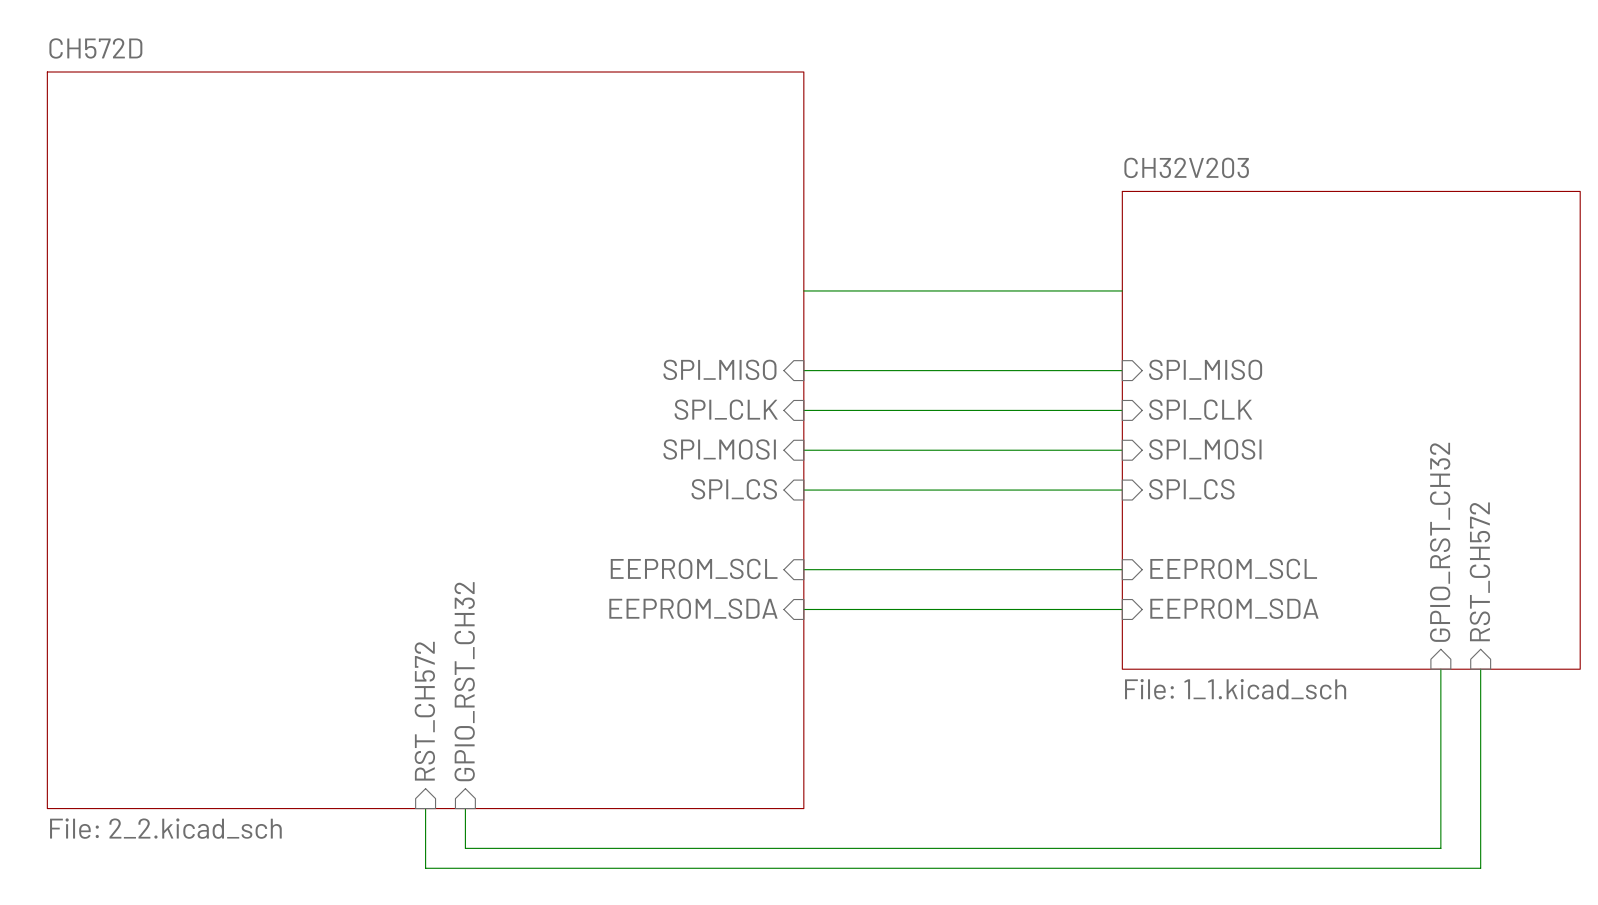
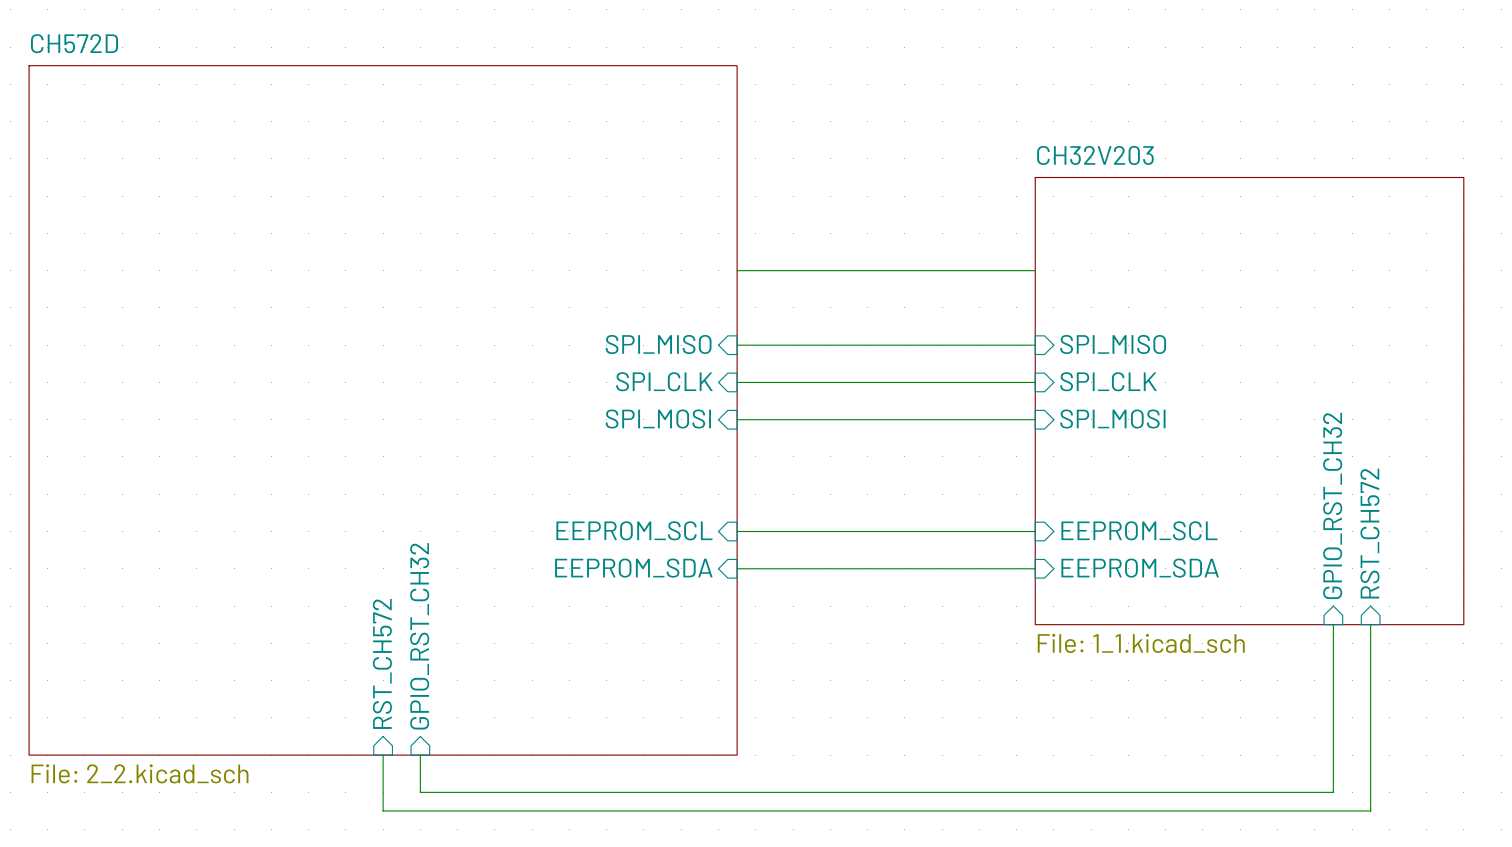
sheet pin: SPI_CS (734, 489) -> none
sheet pin: SPI_CS (1191, 489) -> none
wire: (803, 490) (1122, 490) -> none

